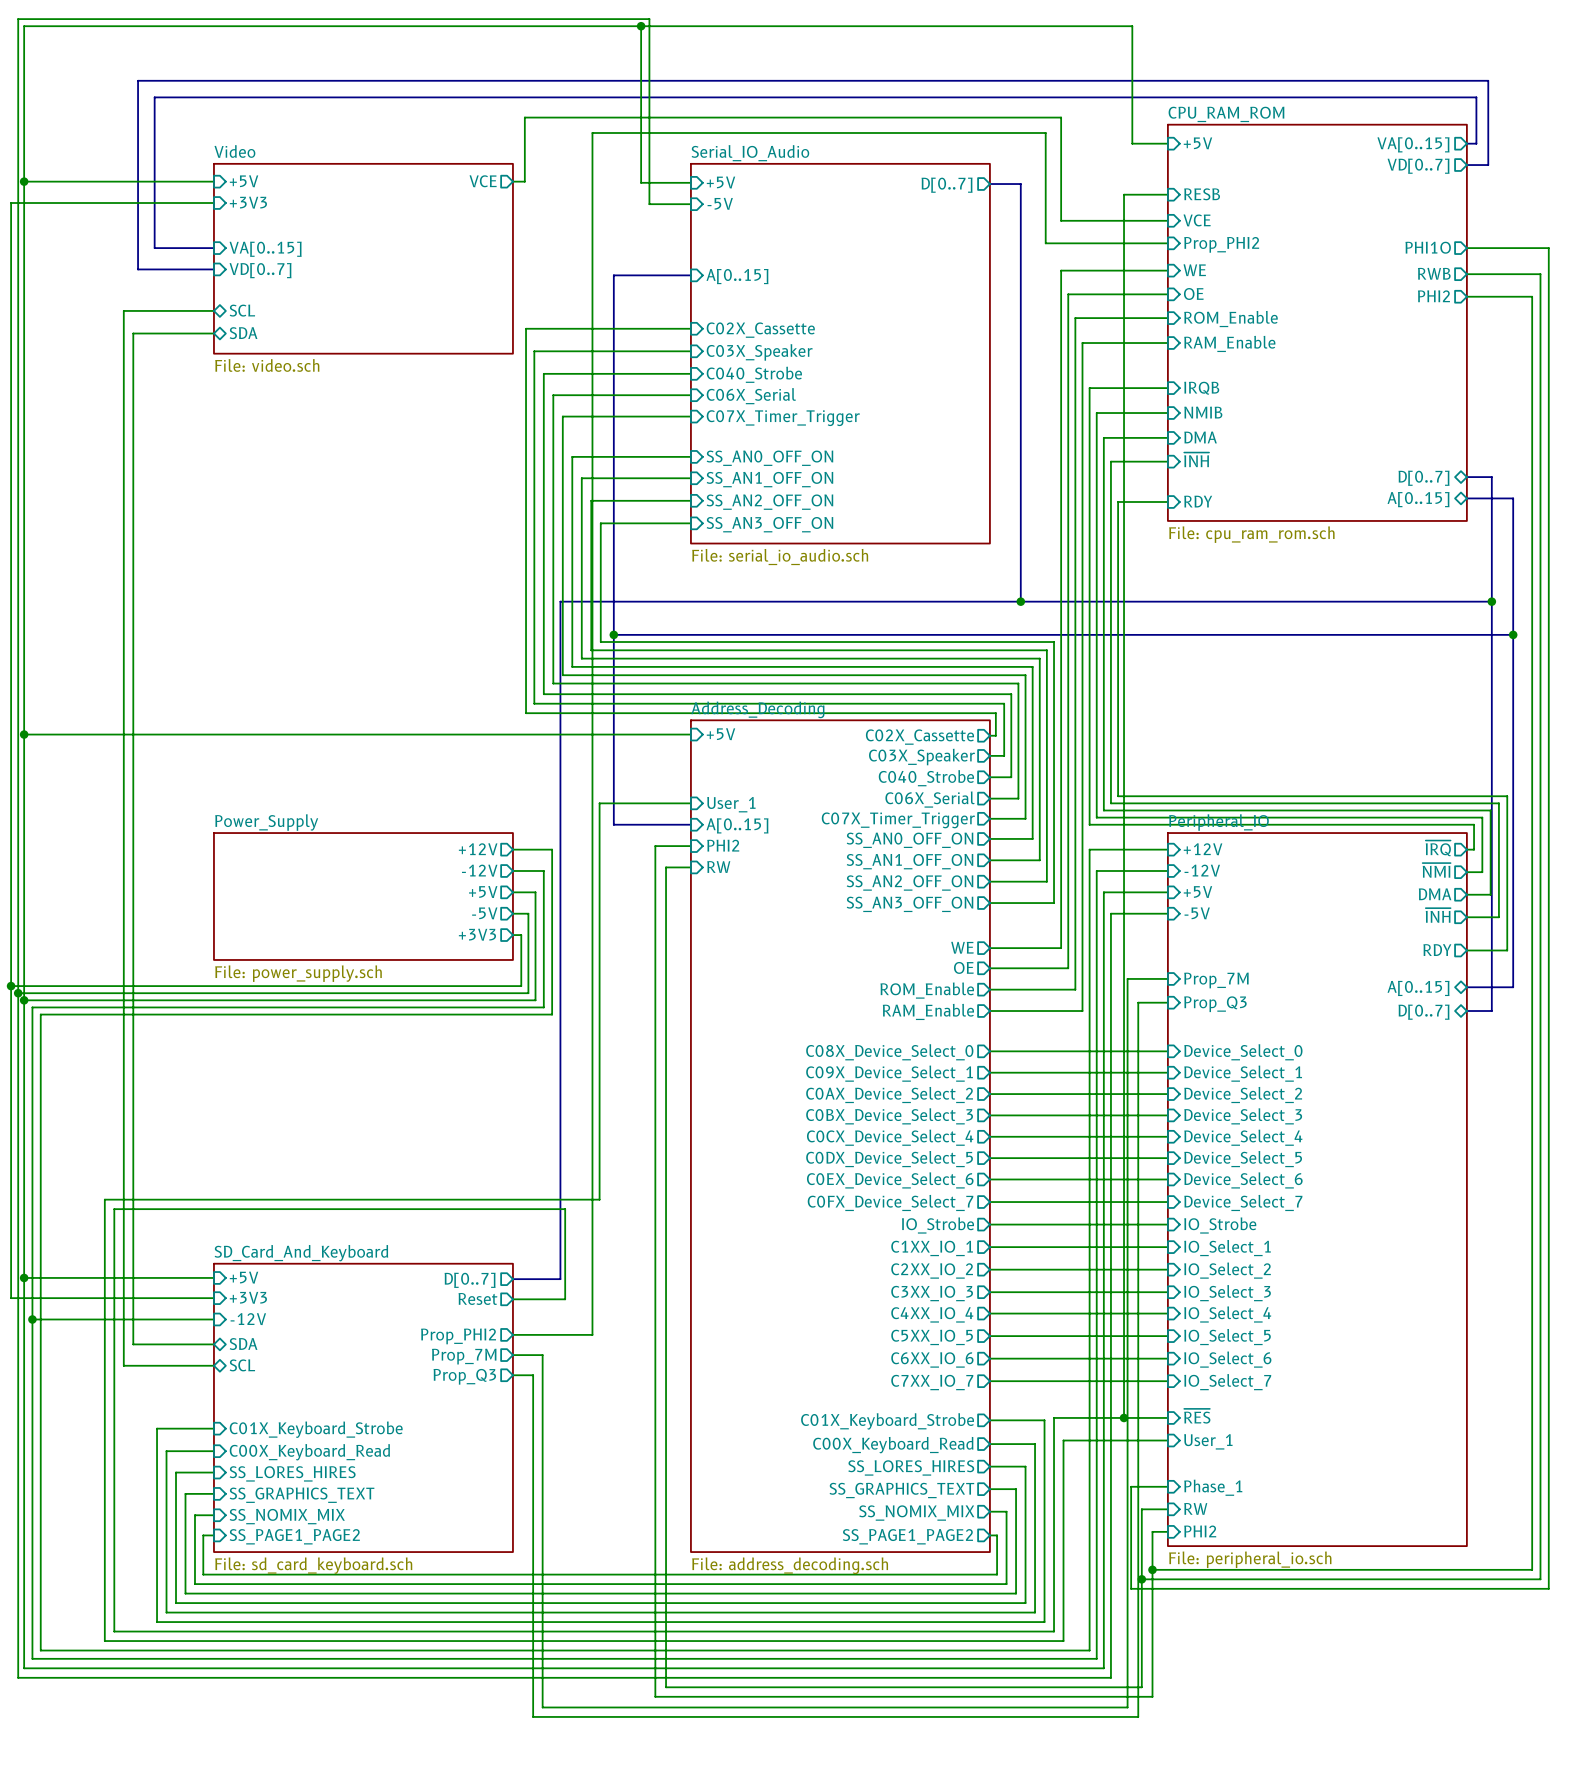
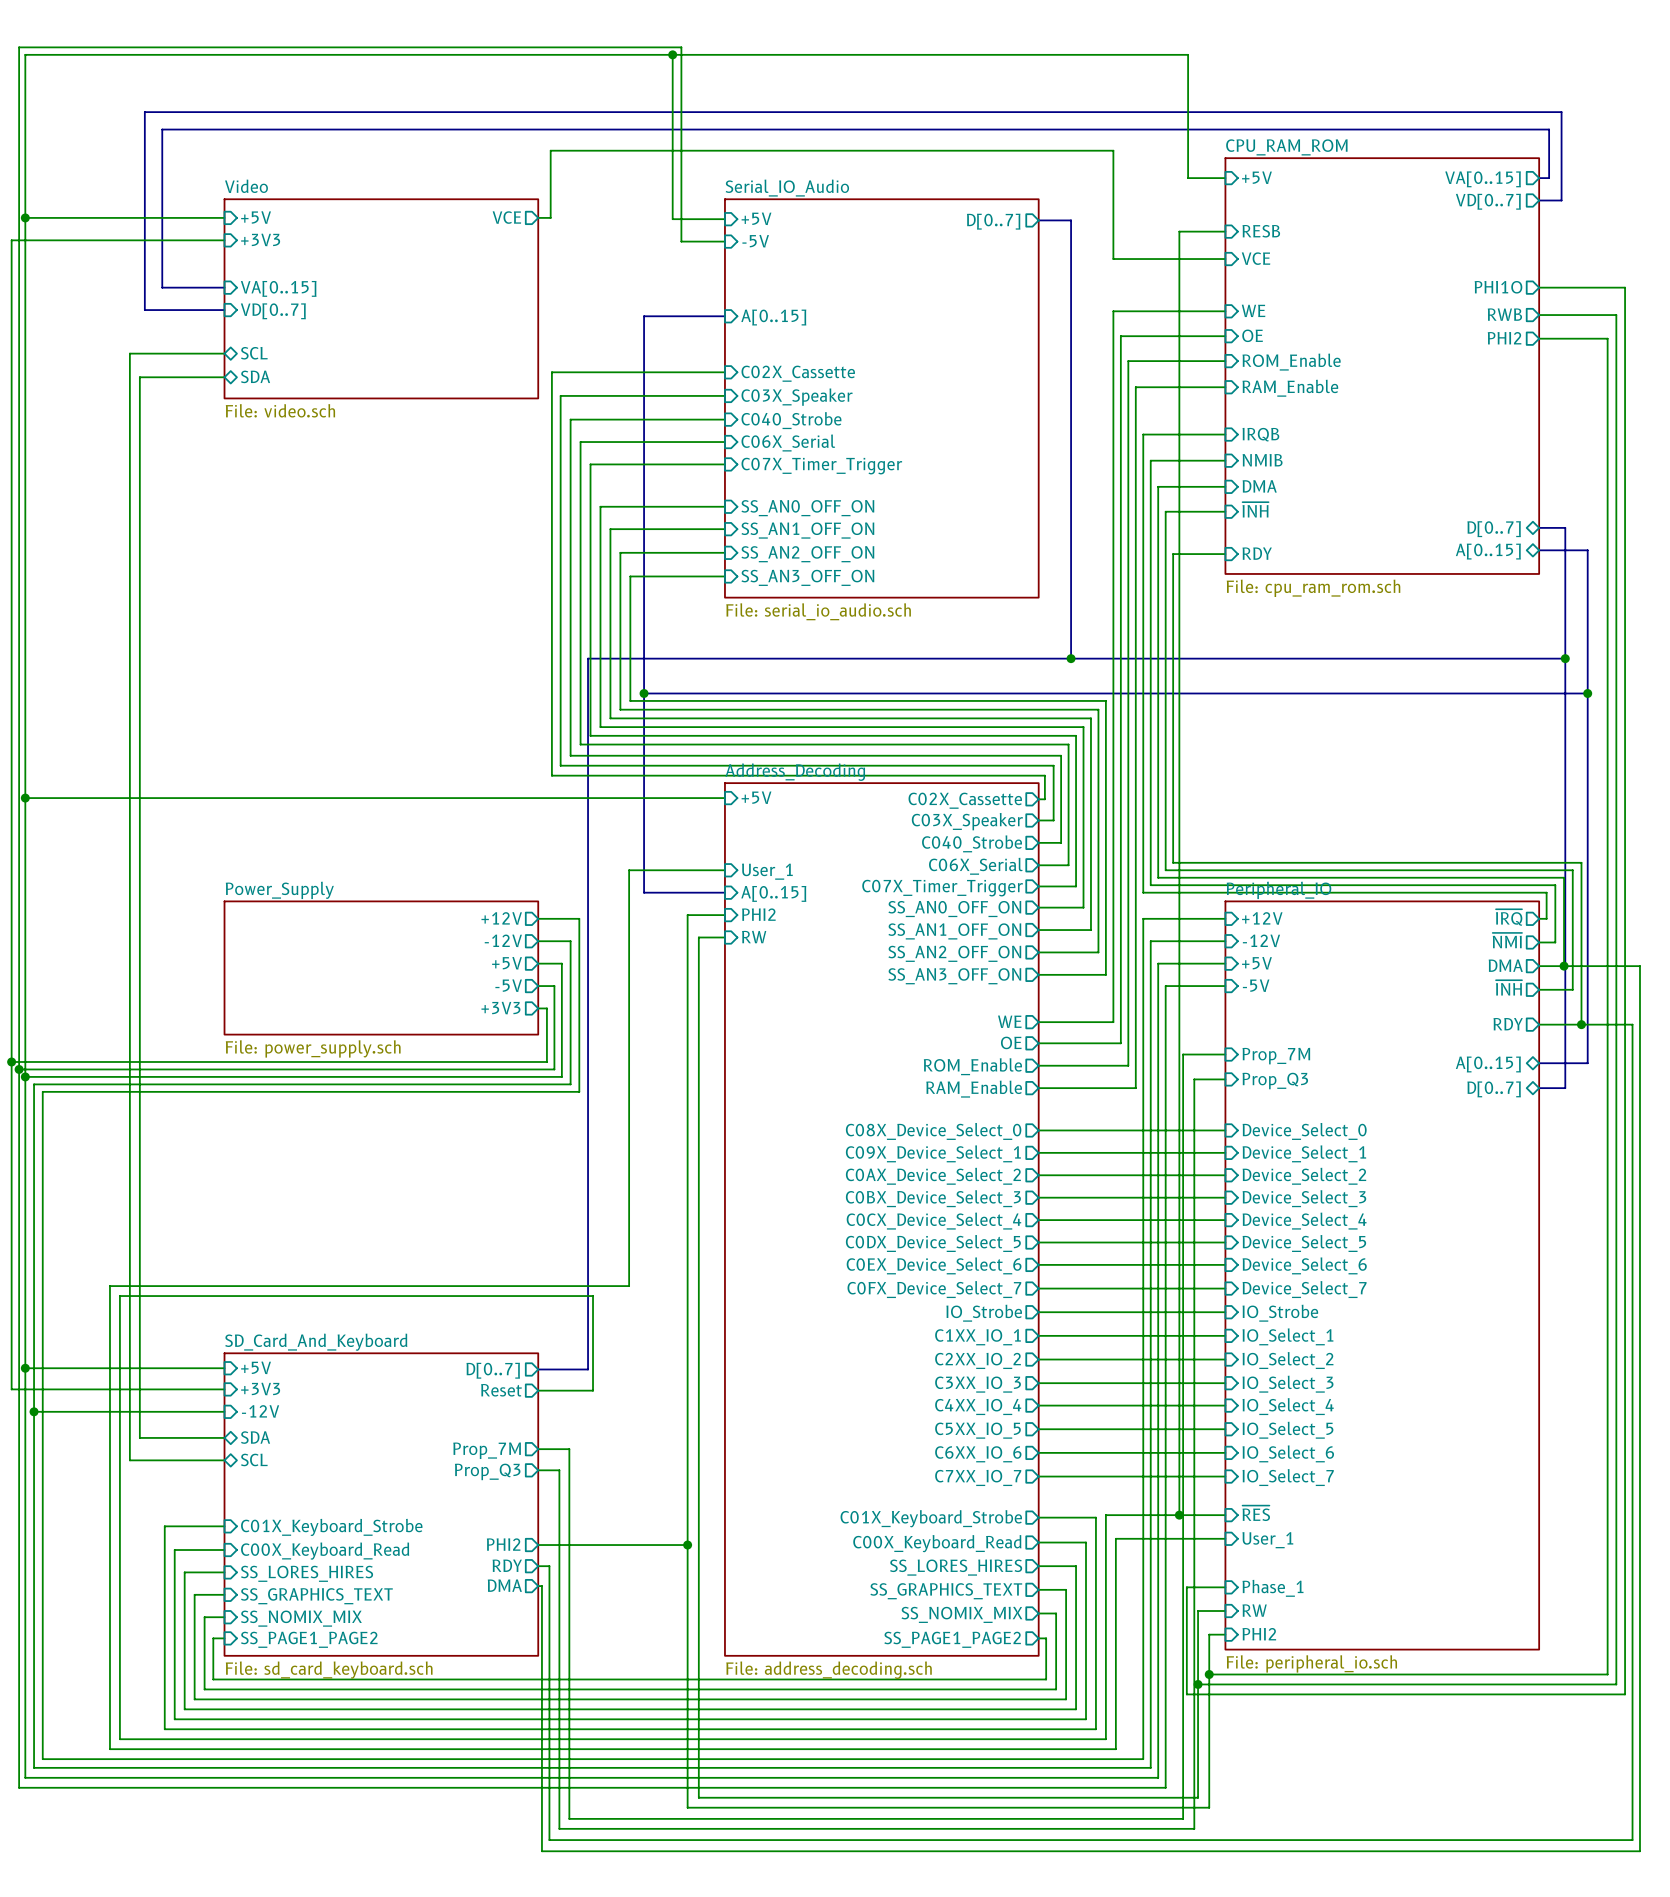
wire: (1167, 243) (1045, 243) (1045, 132) (592, 132) (592, 1334) (512, 1334) -> none
sheet pin: Prop_PHI2 (1221, 244) -> none
wire: none -> (1564, 966) (1639, 966) (1639, 1851) (541, 1851) (541, 1586) (538, 1586)
junction: none -> (1564, 966)
wire: none -> (1581, 1024) (1632, 1024) (1632, 1840) (549, 1840) (549, 1566) (538, 1566)
junction: none -> (1581, 1024)
sheet pin: Prop_PHI2 (458, 1336) -> none
sheet pin: none -> PHI2 (503, 1544)
wire: none -> (538, 1545) (687, 1545)
junction: none -> (687, 1545)
sheet pin: none -> RDY (507, 1565)
sheet pin: none -> DMA (504, 1585)

